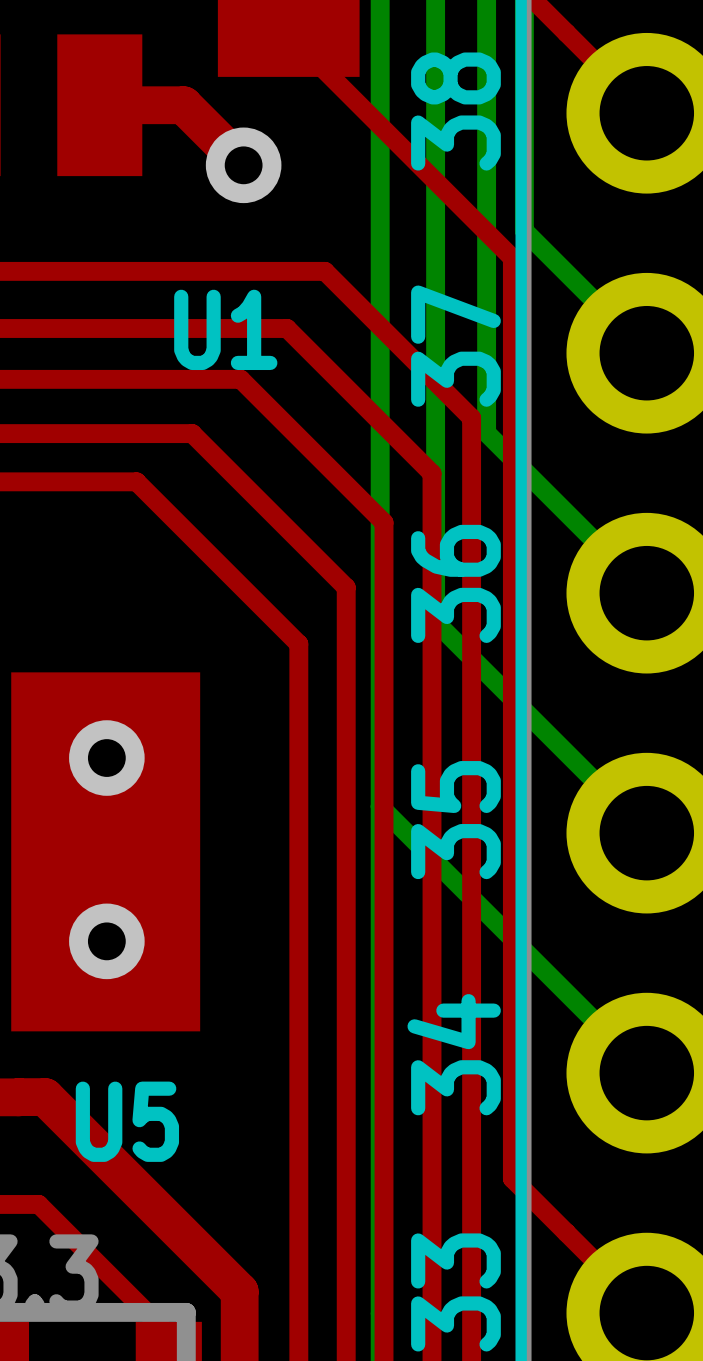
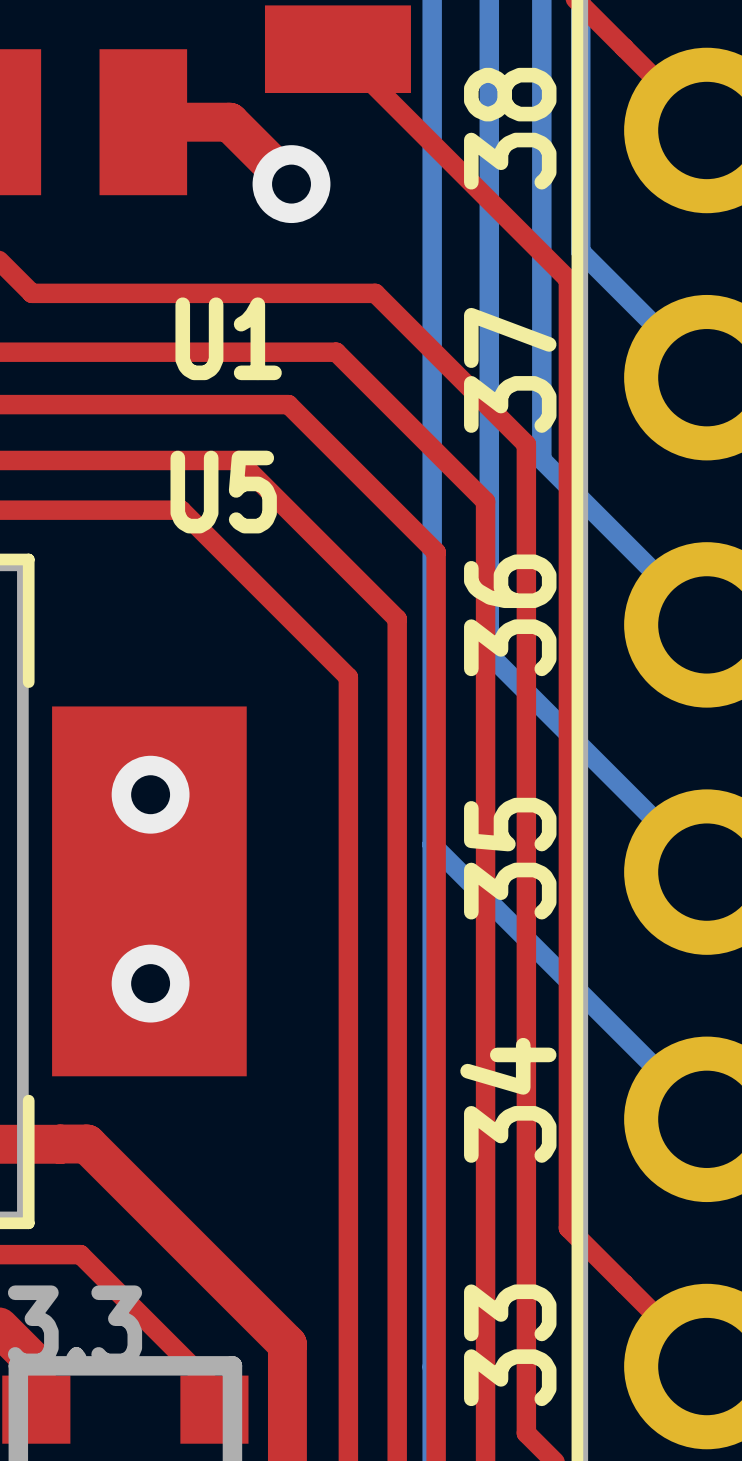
U1 name position: U1 (225, 329) -> U1 (228, 338)
U5 name position: U5 (127, 1121) -> U5 (223, 492)

